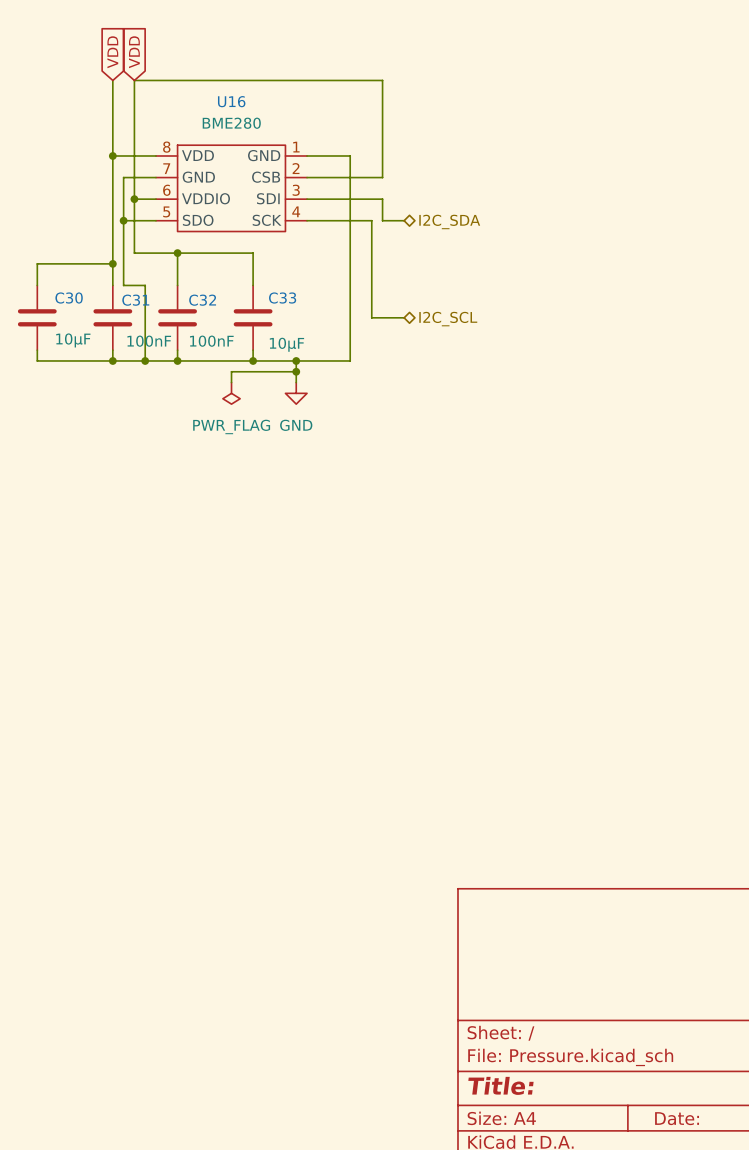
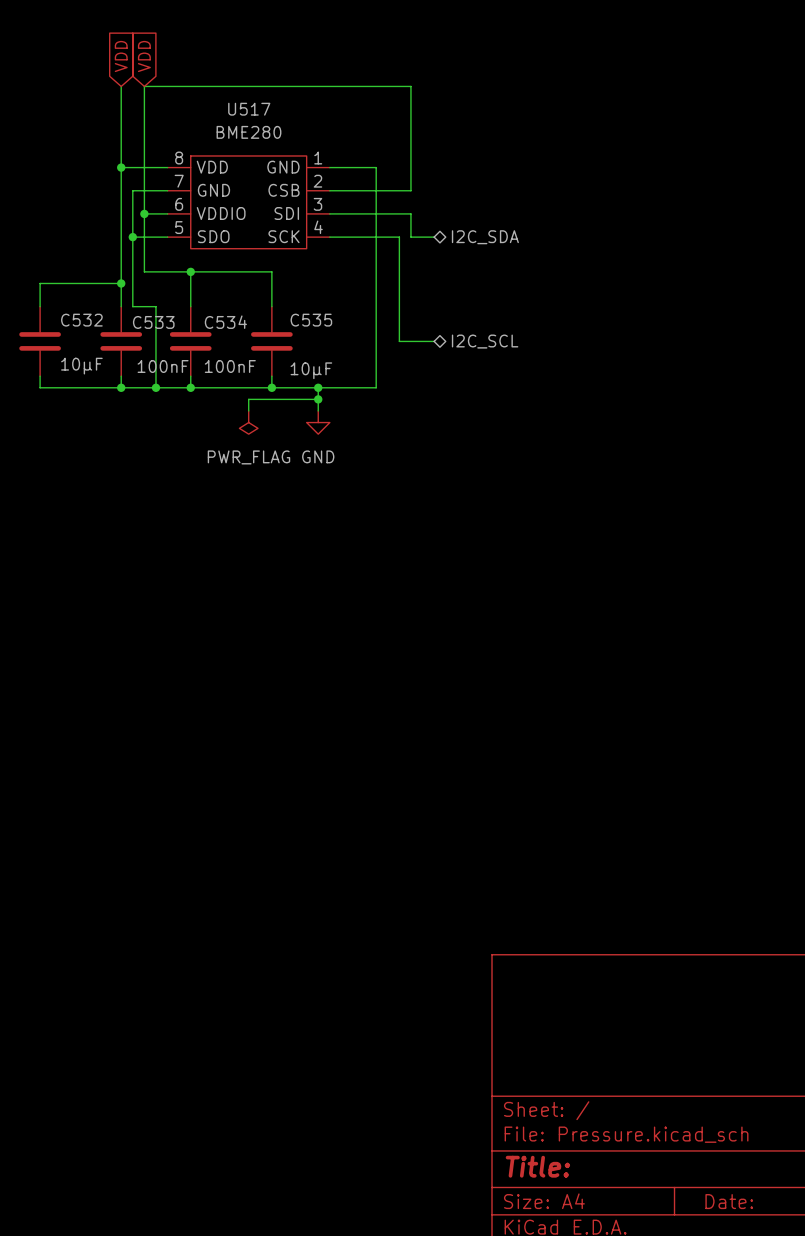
U16 name: U16 (231, 101) -> U517 (249, 109)
C30 name: C30 (69, 298) -> C532 (81, 320)
C33 name: C33 (282, 298) -> C535 (311, 320)
C31 name: C31 (135, 300) -> C533 (153, 322)
C32 name: C32 (202, 300) -> C534 (225, 322)

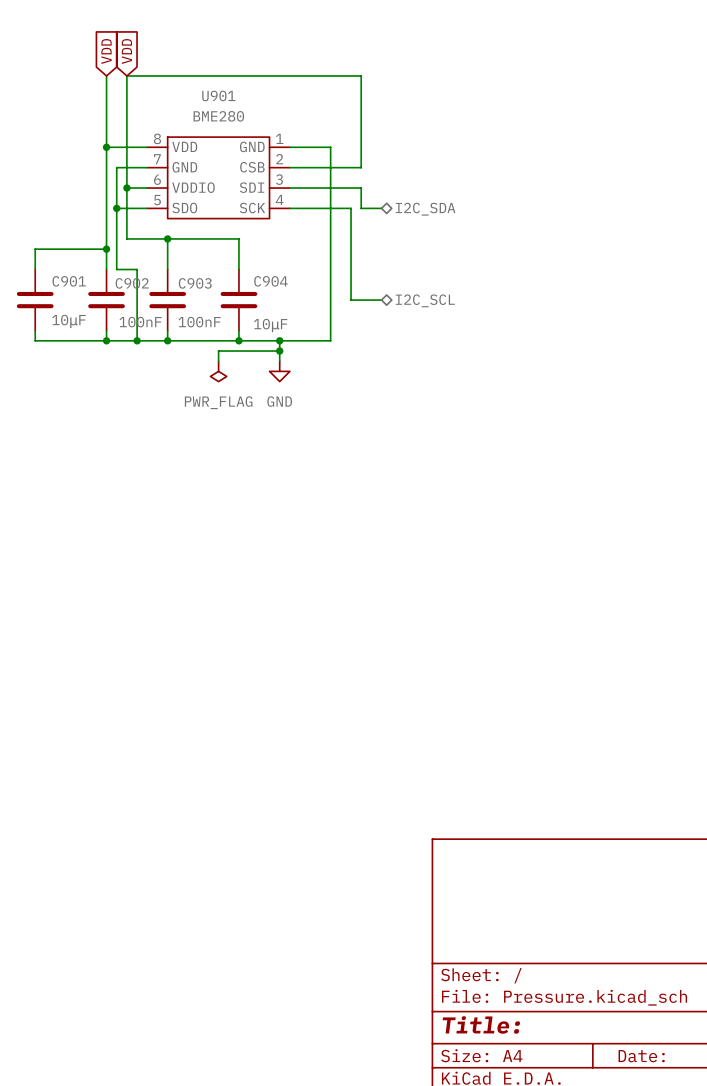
U517 name: U517 (249, 109) -> U901 (218, 95)
C532 name: C532 (81, 320) -> C901 (69, 281)
C535 name: C535 (311, 320) -> C904 (270, 281)
C533 name: C533 (153, 322) -> C902 (132, 283)
C534 name: C534 (225, 322) -> C903 (195, 283)

